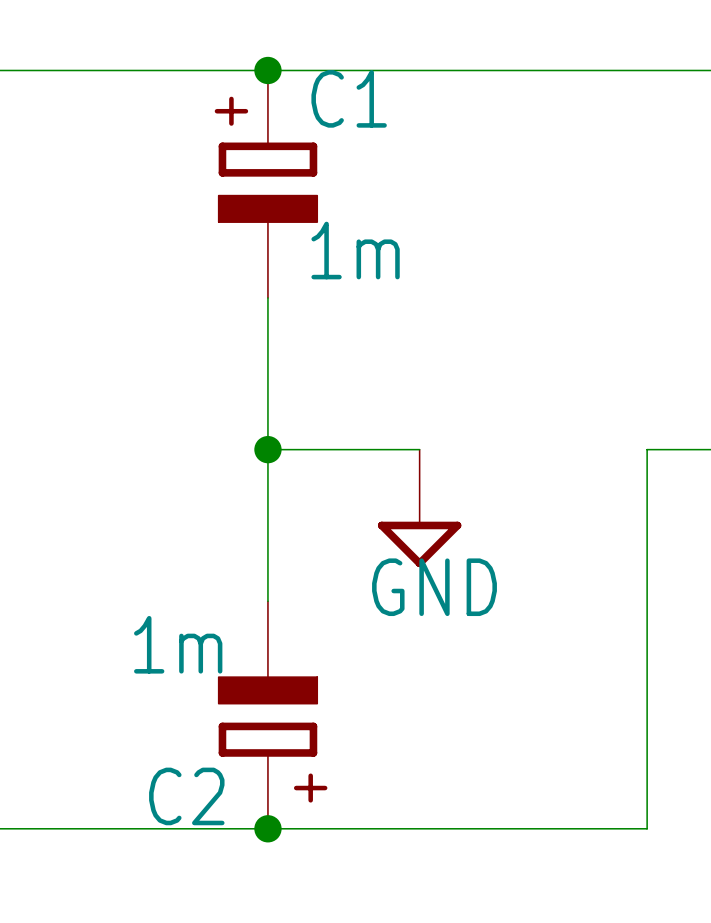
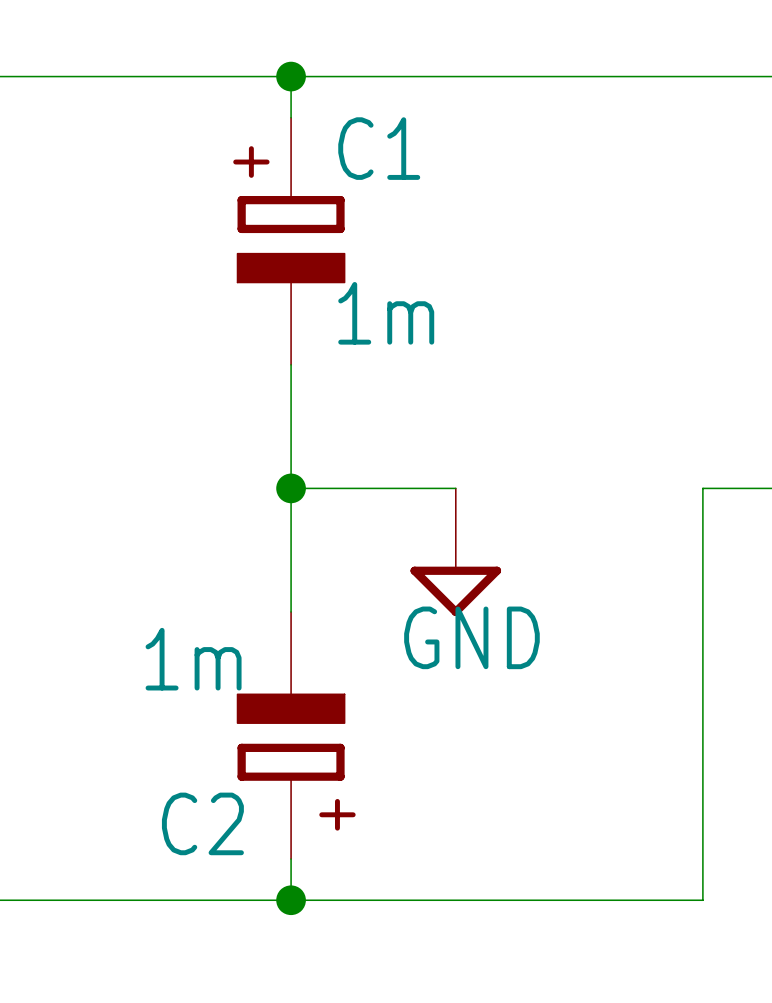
C1 position: (267, 184) -> (291, 241)
C2 position: (267, 715) -> (291, 735)

